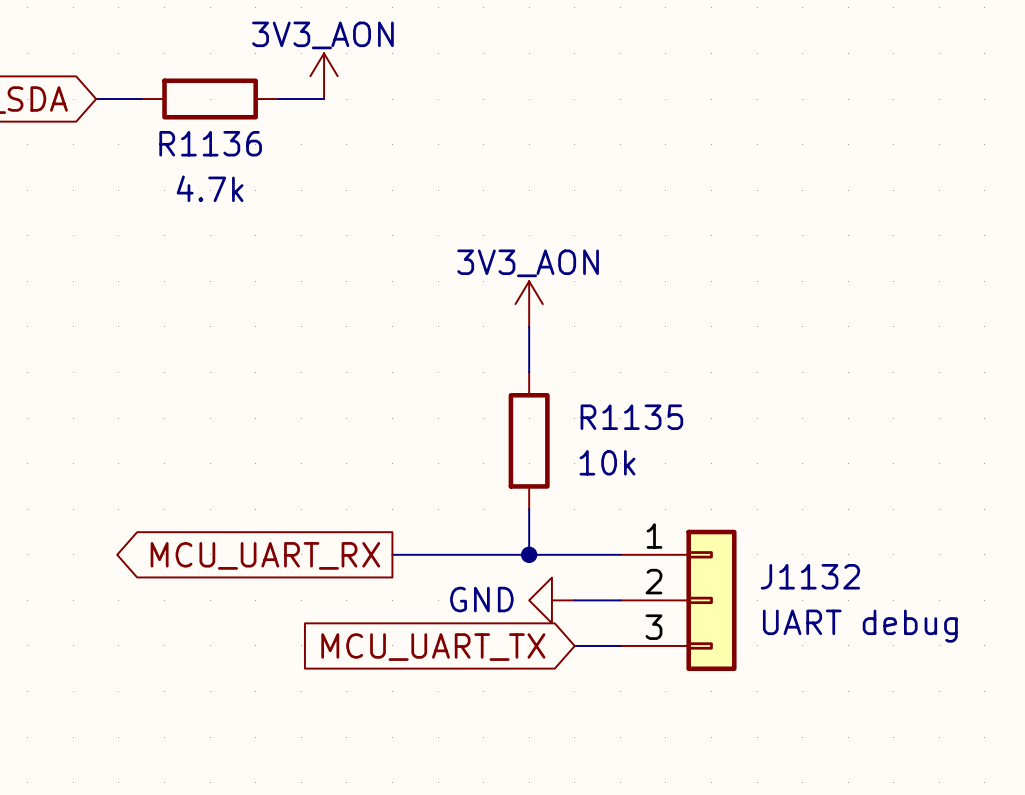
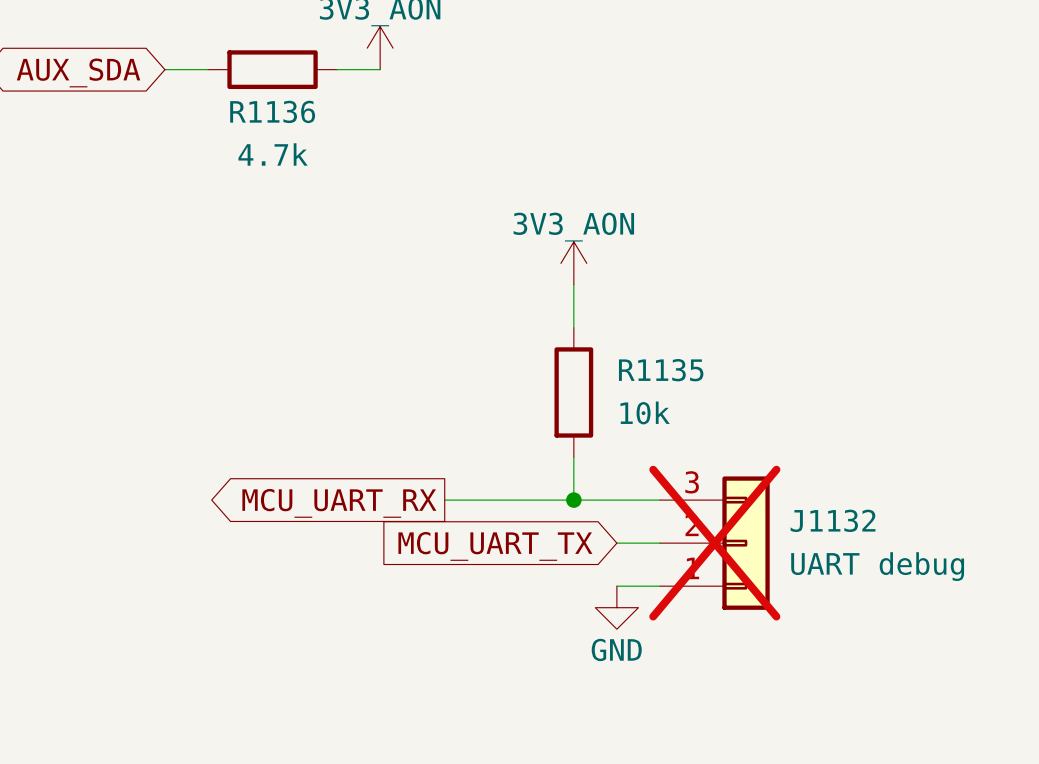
power symbol rotation: 0° (551, 600) -> 90° counterclockwise (616, 607)
power symbol position: GND (551, 600) -> GND (616, 607)
J1132 do-not-place cross: none -> (714, 543)
J1132 flip: as is (711, 600) -> up-down (746, 543)
global label position: MCU_UART_TX (433, 647) -> MCU_UART_TX (495, 546)

